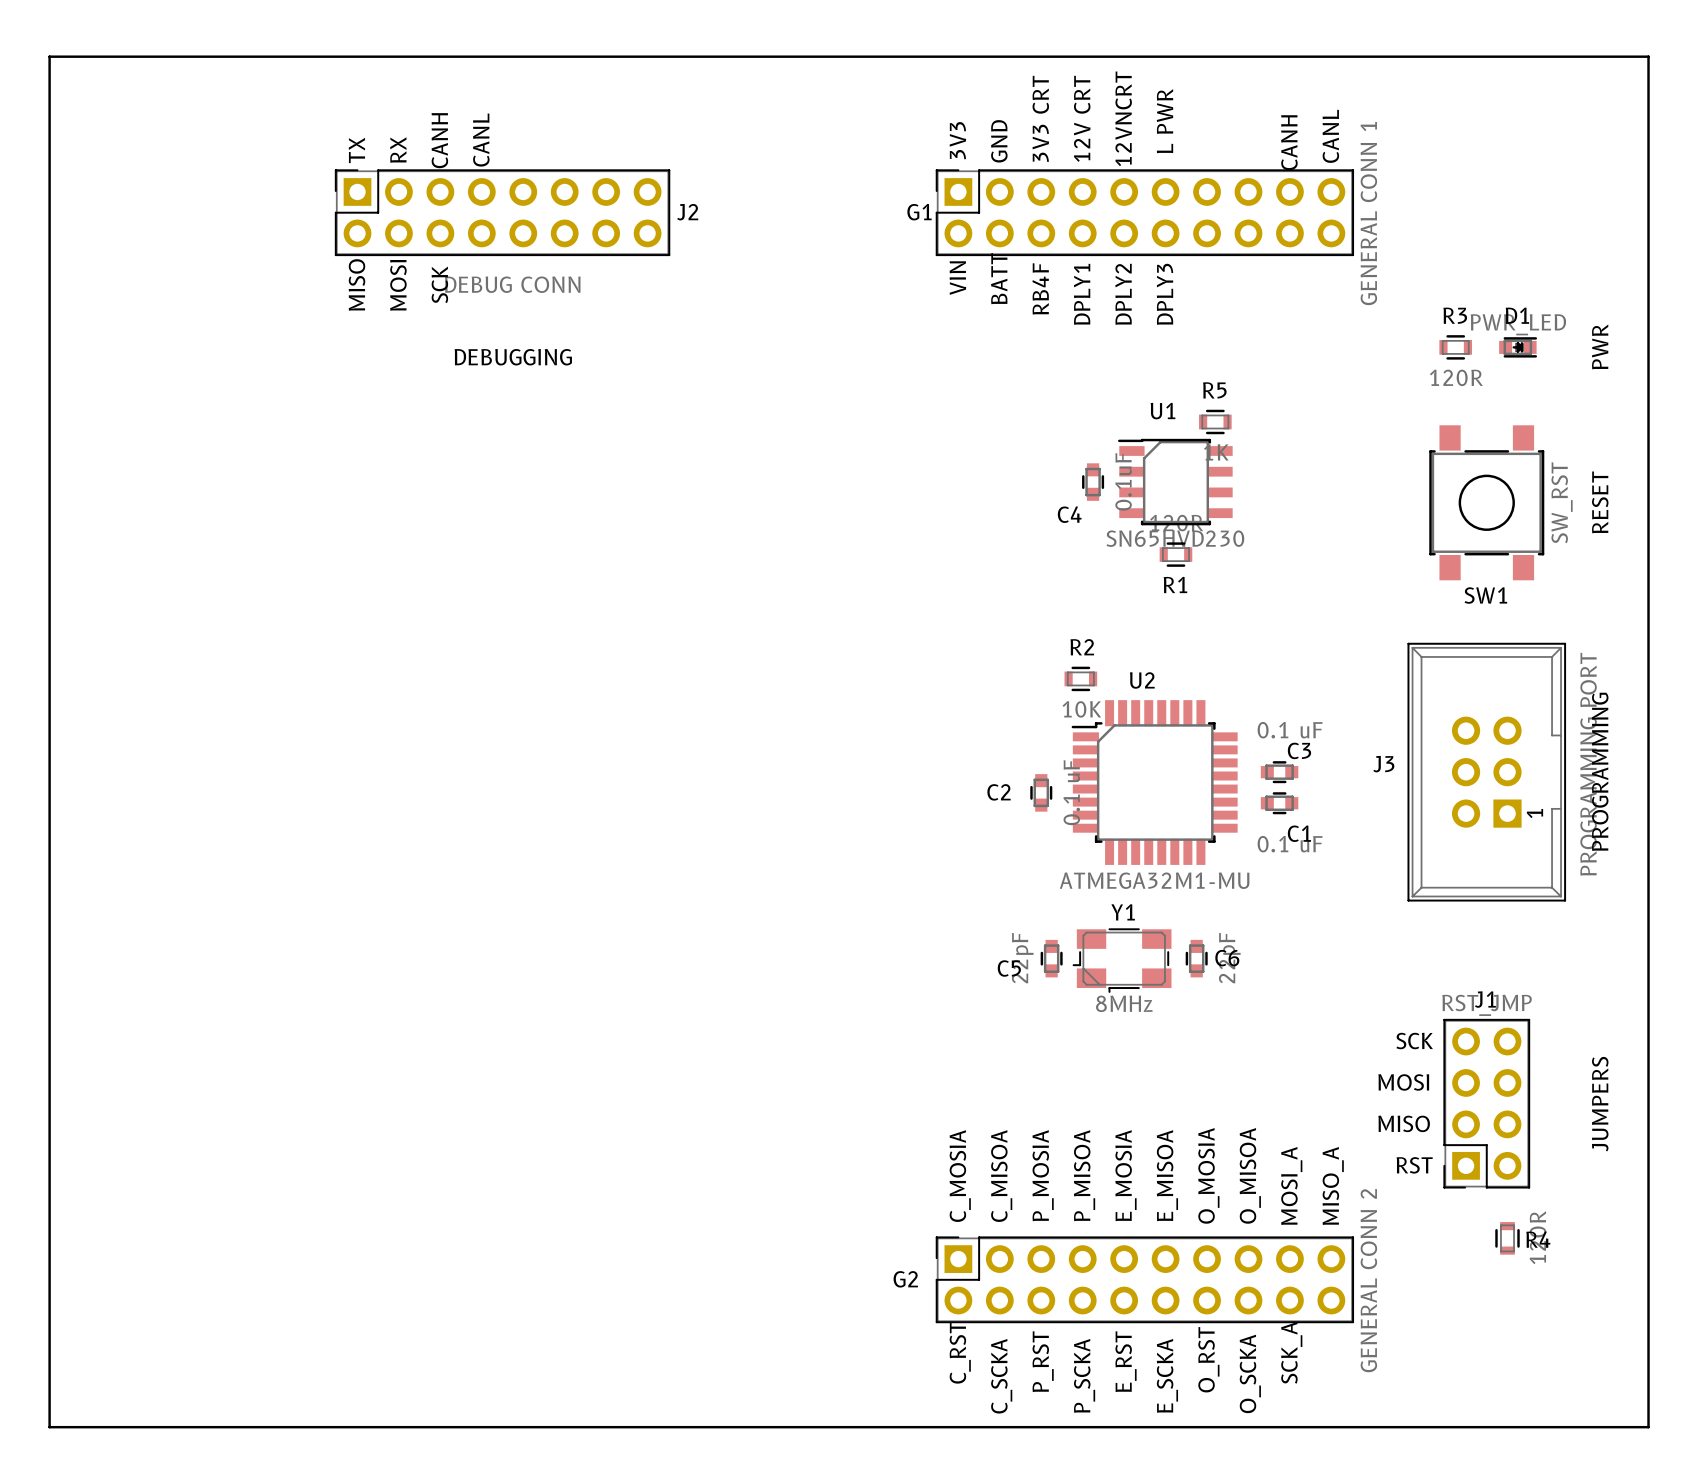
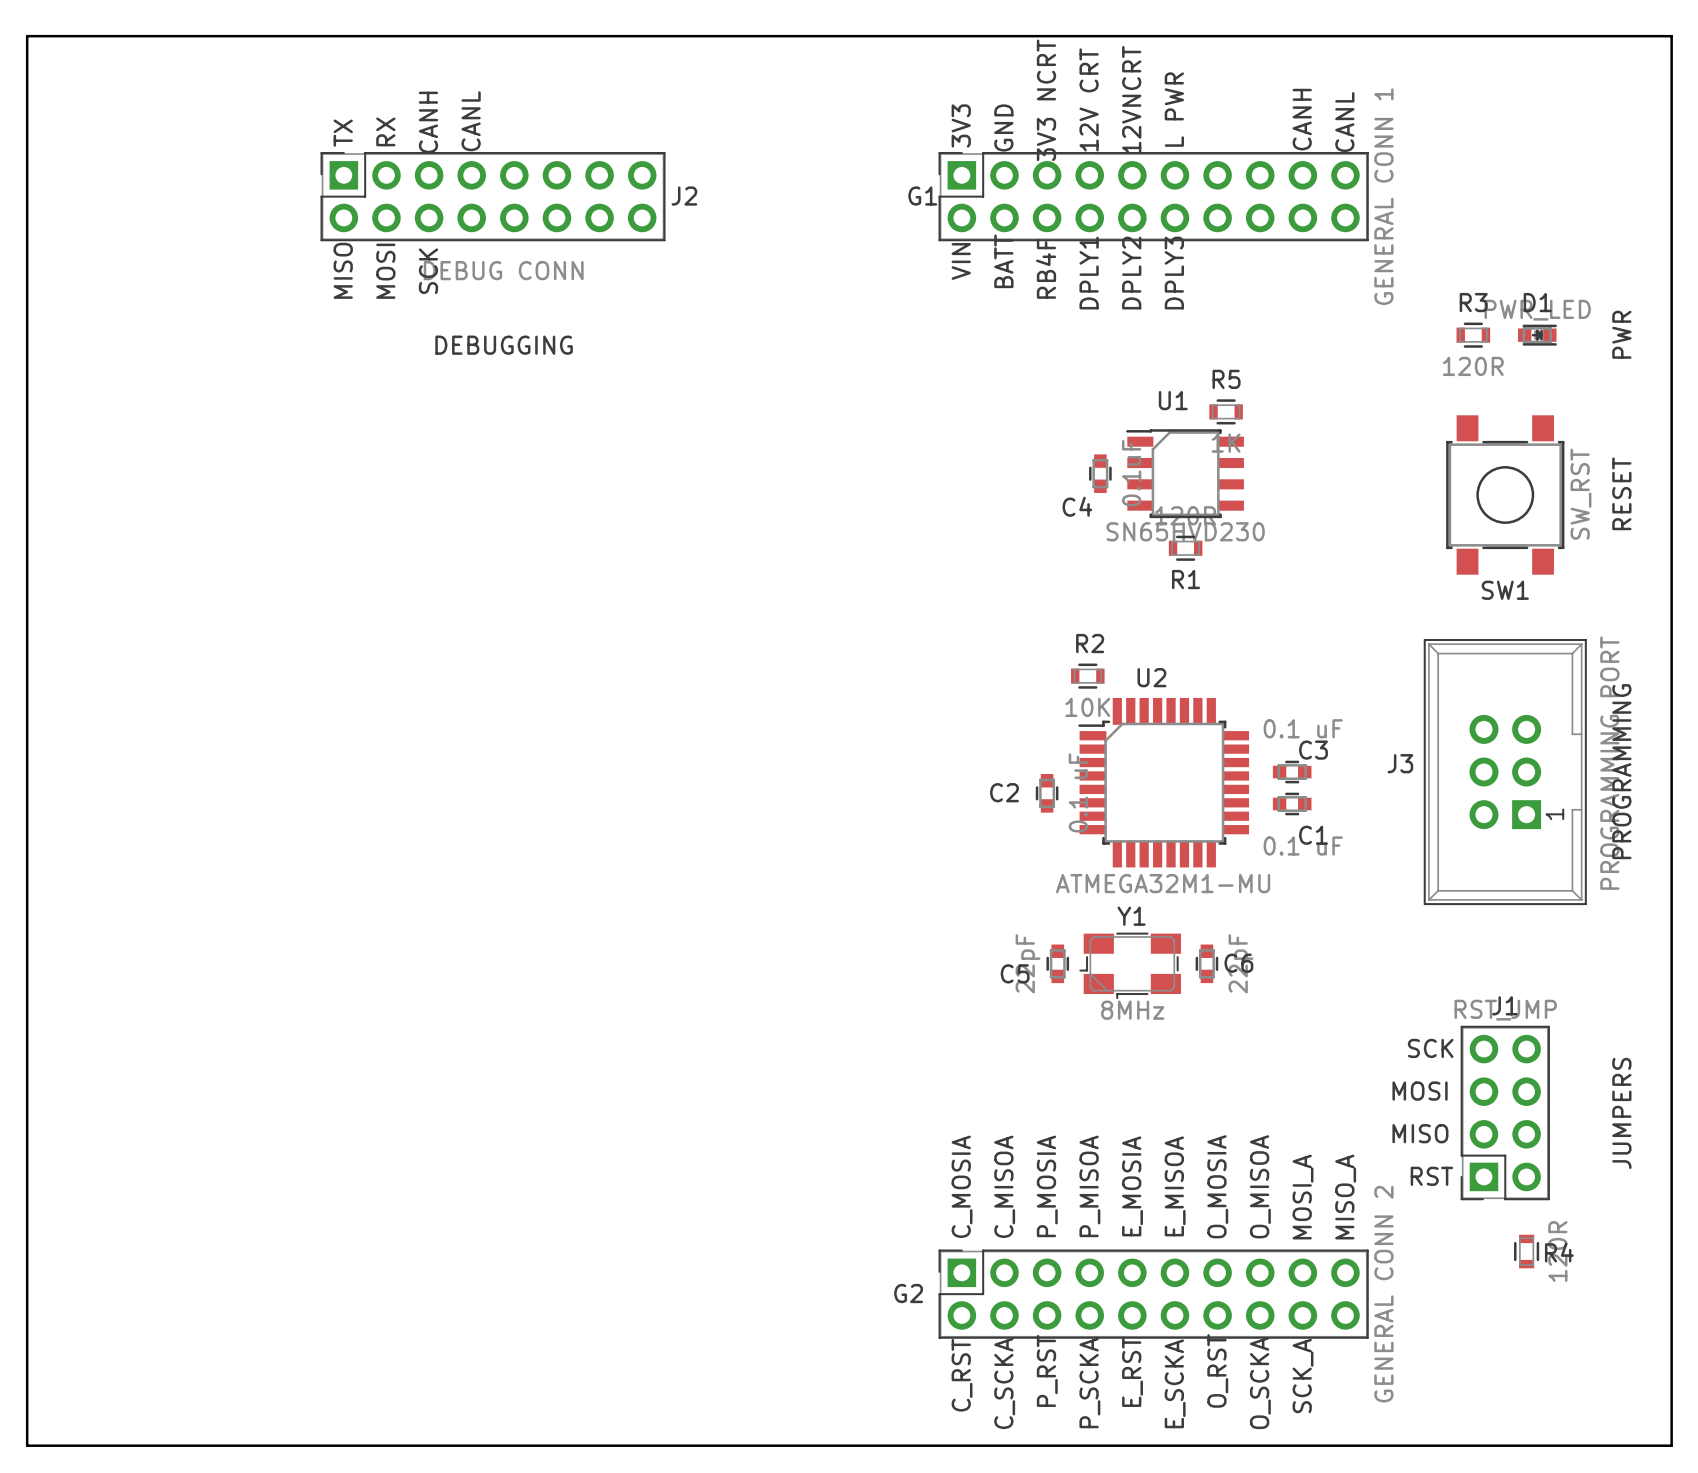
text: 3V3 CRT (1040, 118) -> 3V3 NCRT (1046, 100)

